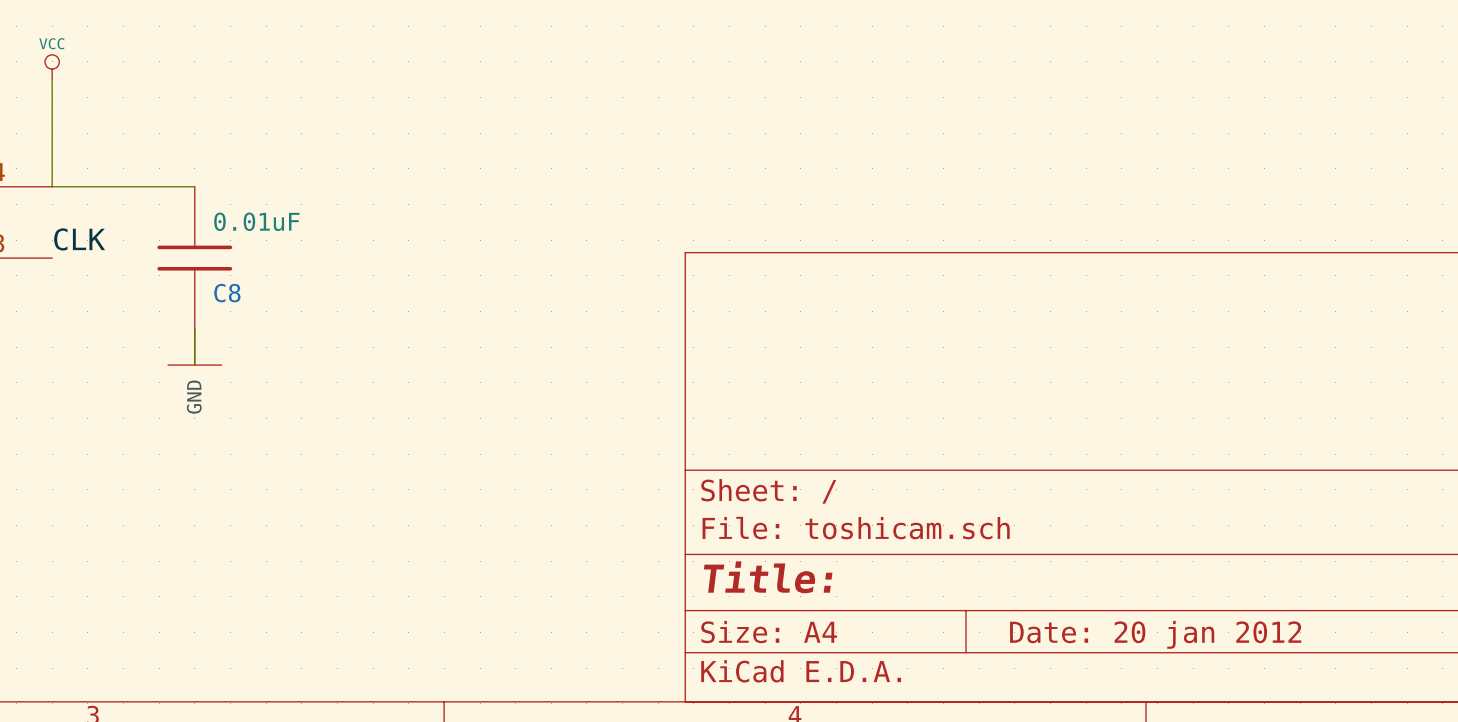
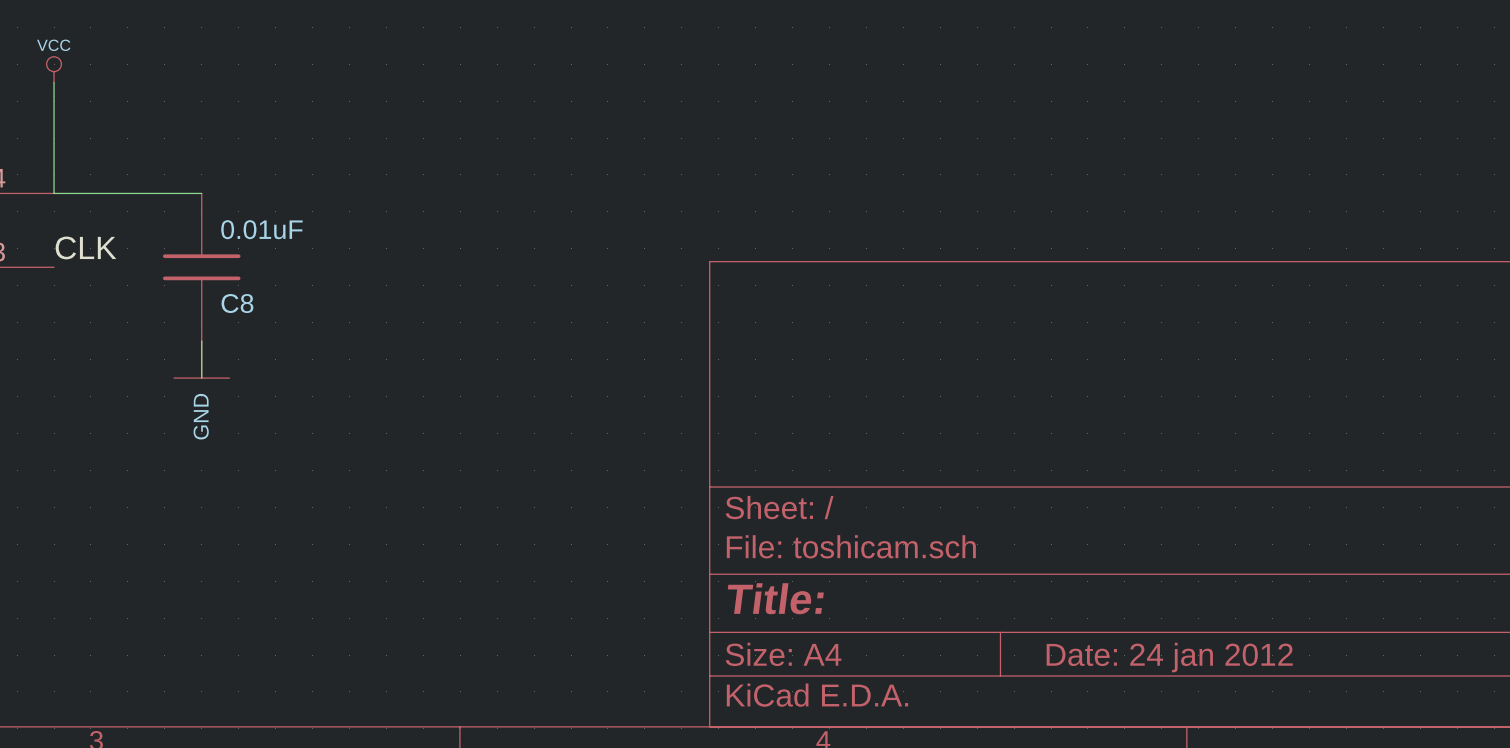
title block: Date: 20 jan 2012 (1155, 634) -> Date: 24 jan 2012 (1169, 657)

